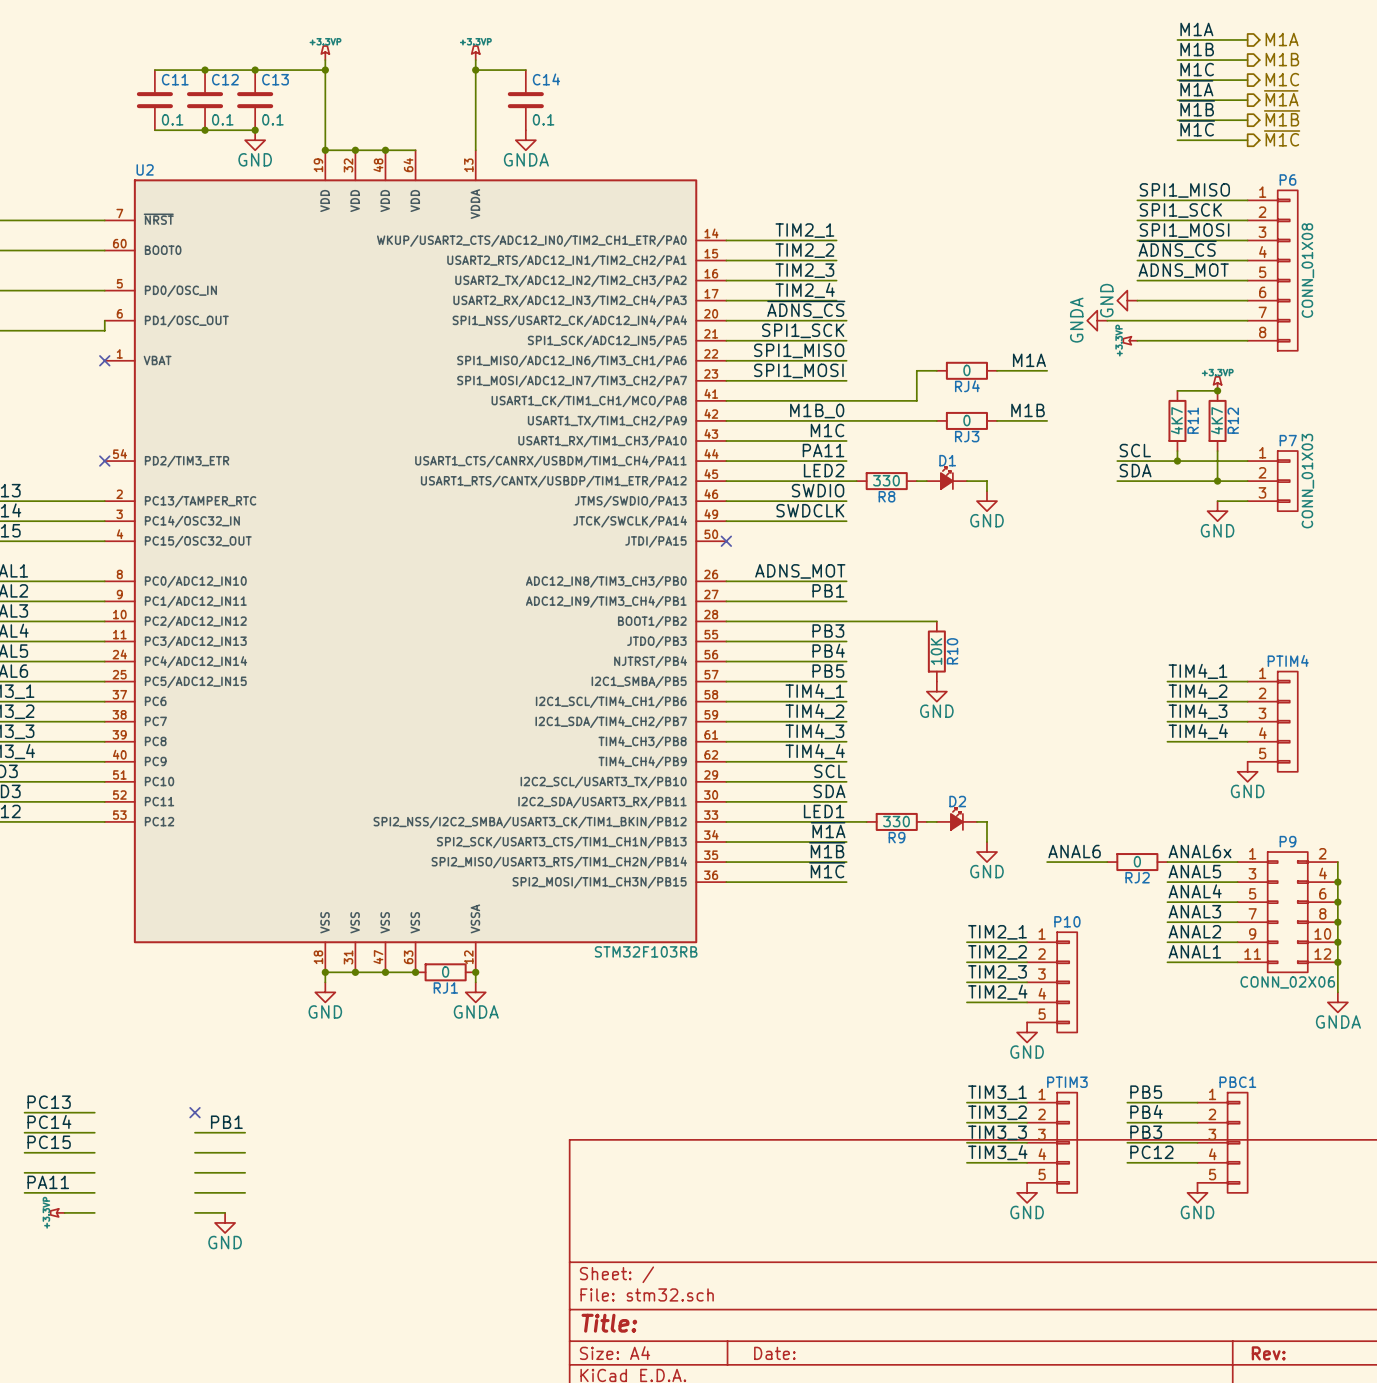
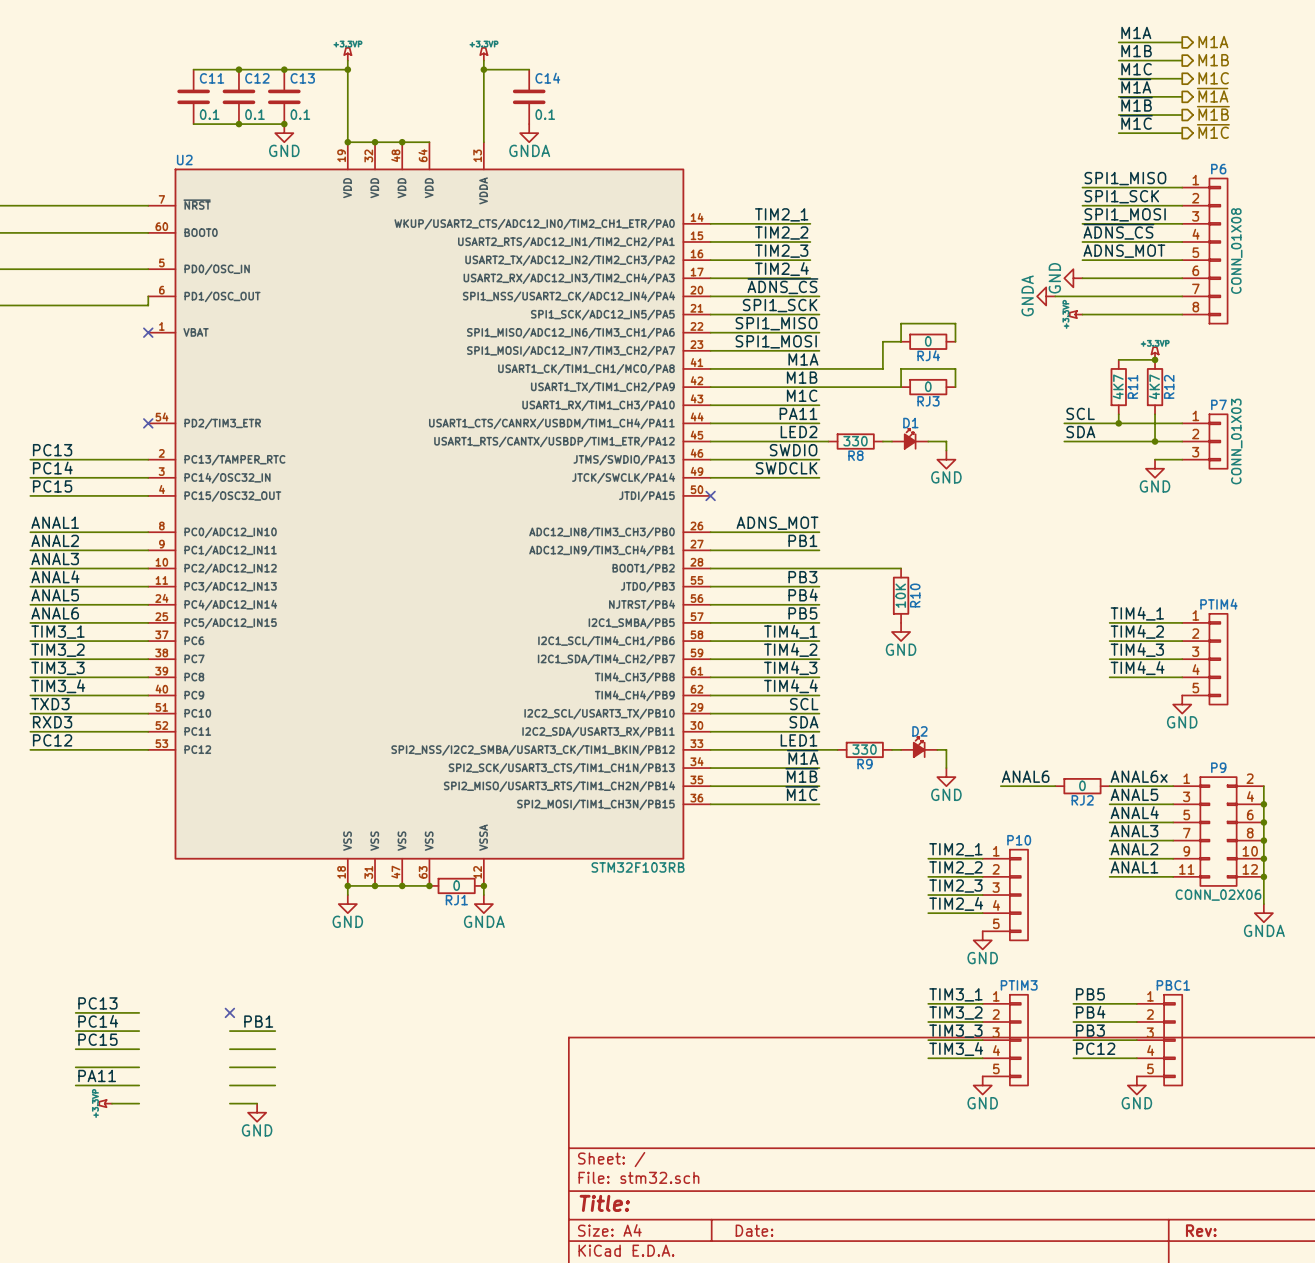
label: M1A (1029, 360) -> none
wire: (997, 370) (1047, 370) -> (955, 341) (955, 323) (901, 323) (901, 341)
label: none -> M1A (803, 359)
label: M1B (1028, 410) -> none
label: M1B_0 (817, 411) -> M1B (802, 377)
wire: (997, 420) (1047, 420) -> (955, 387) (955, 368) (901, 368) (901, 387)

